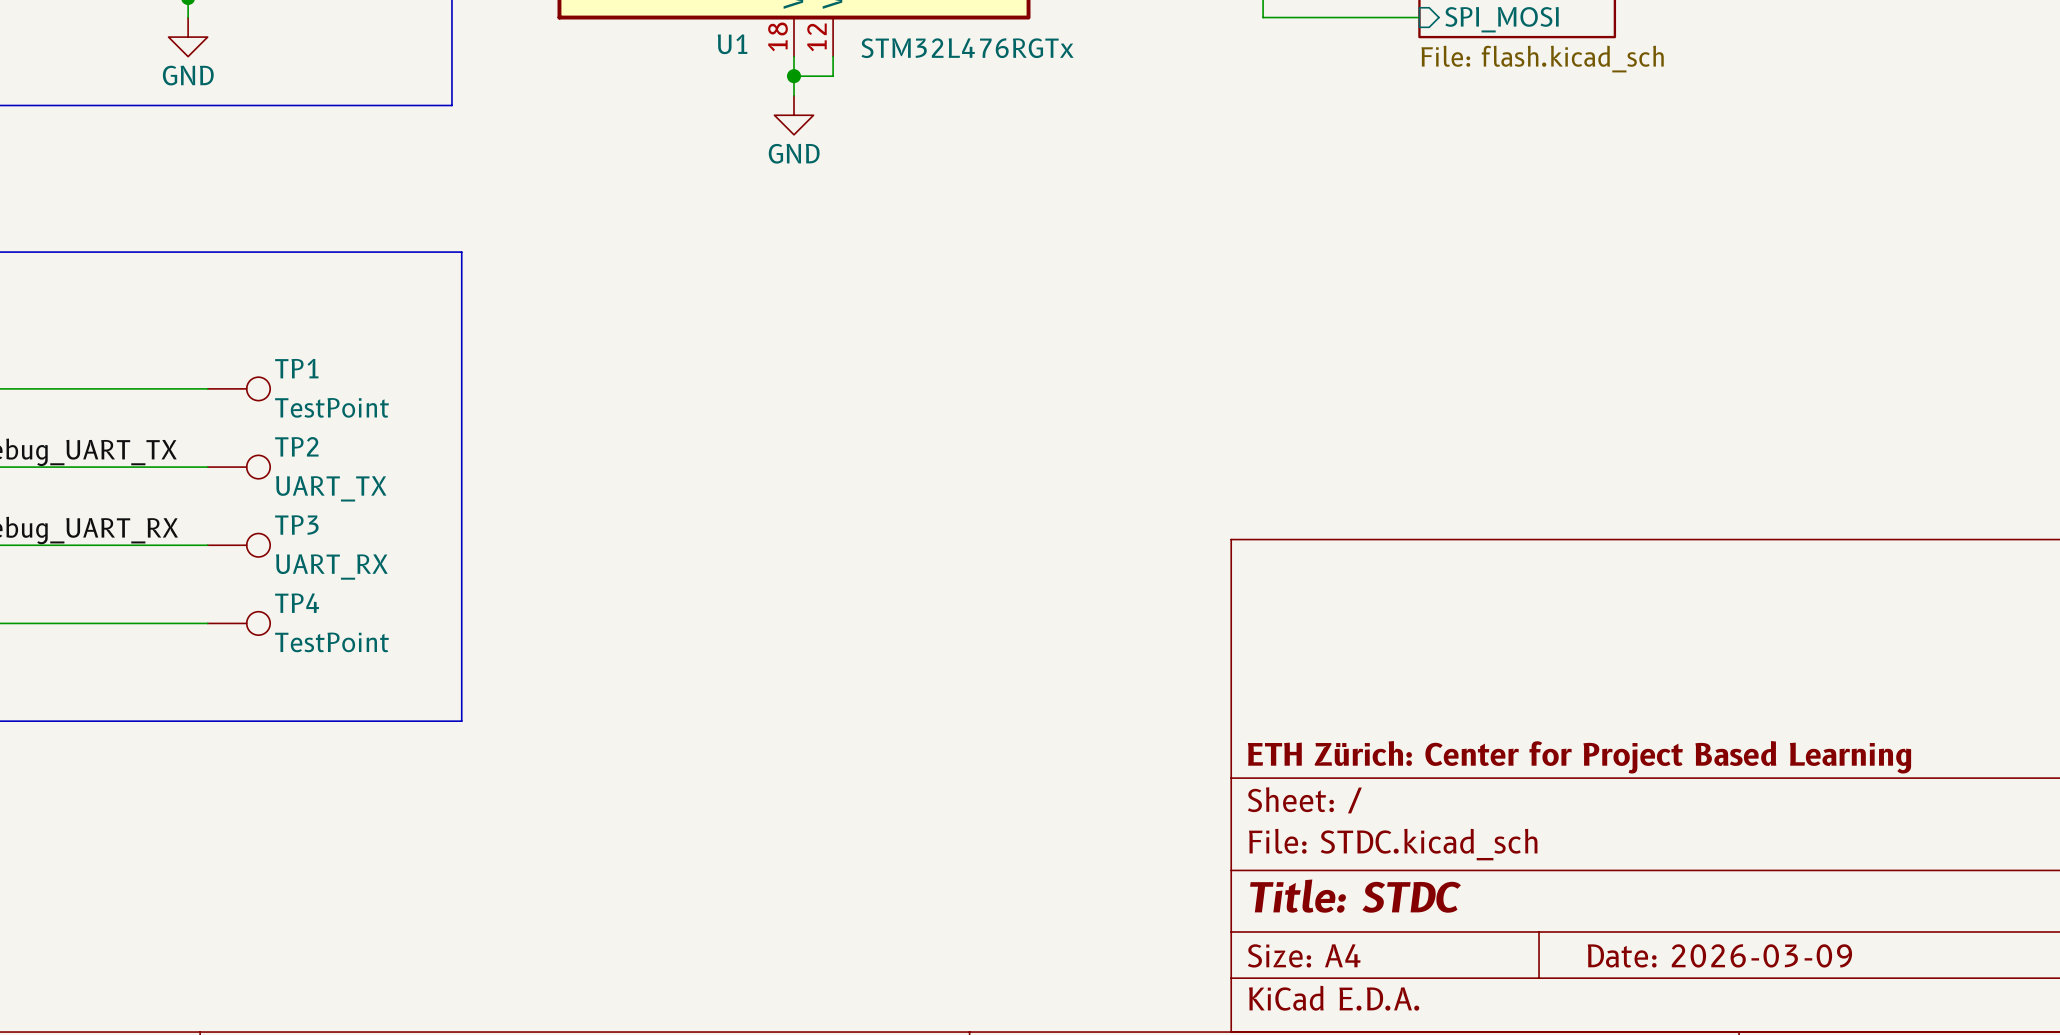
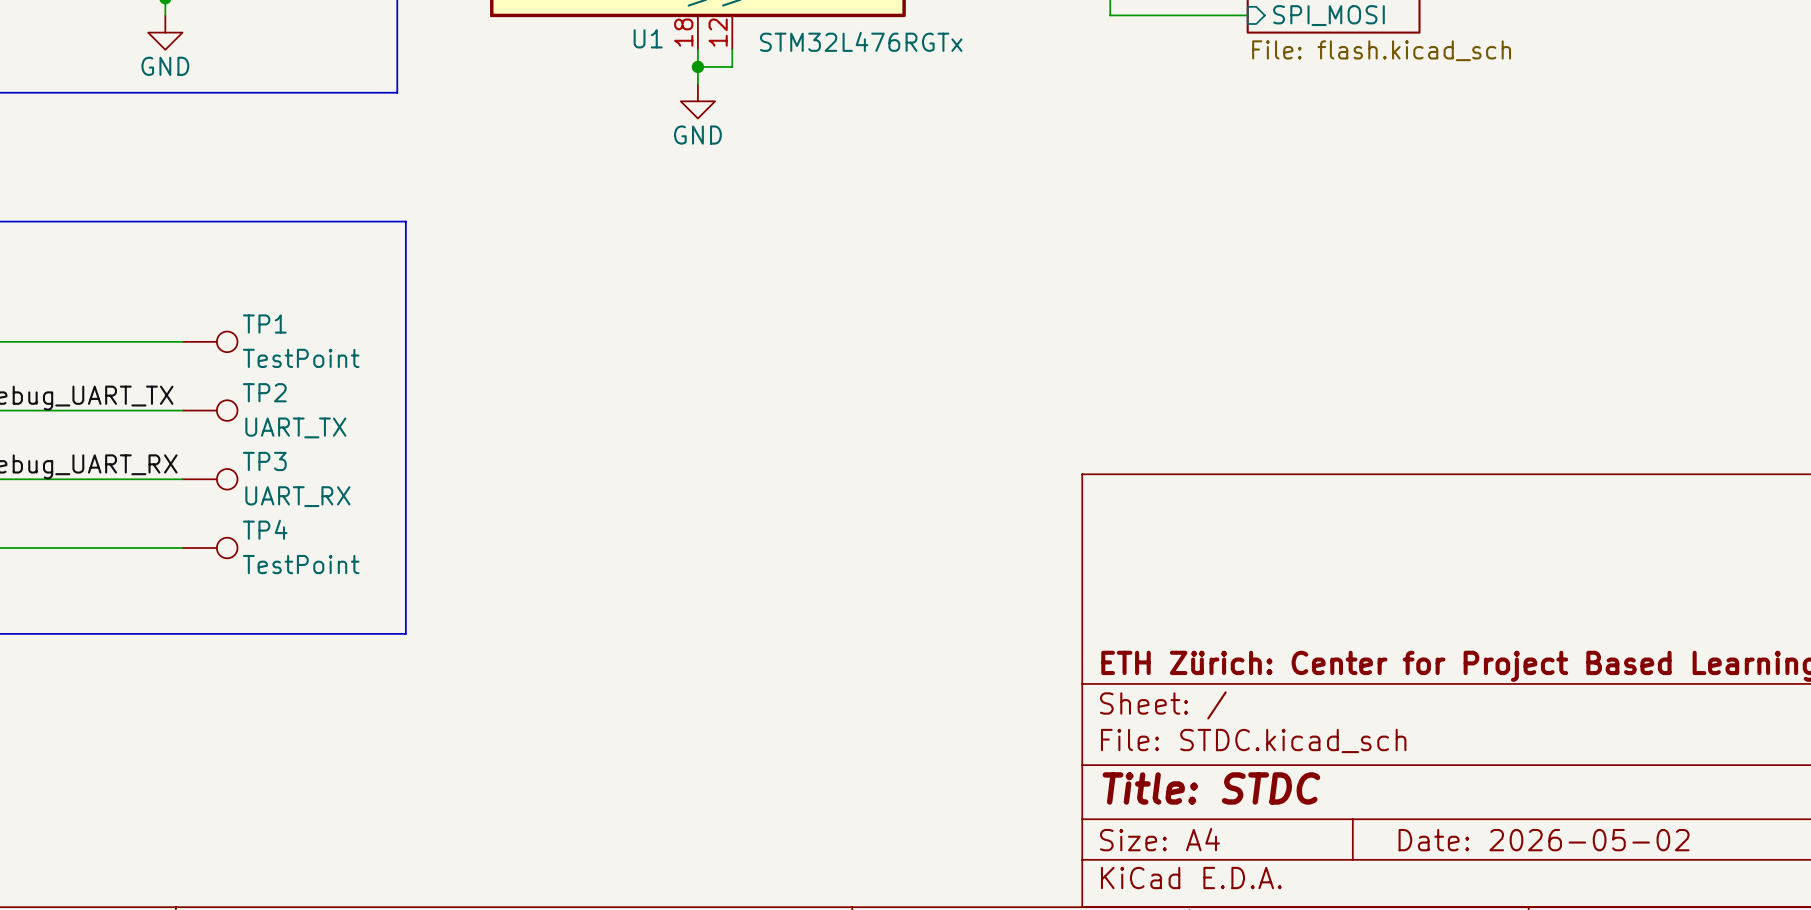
title block: Date: 2026-03-09 (1719, 955) -> Date: 2026-05-02 (1544, 840)

